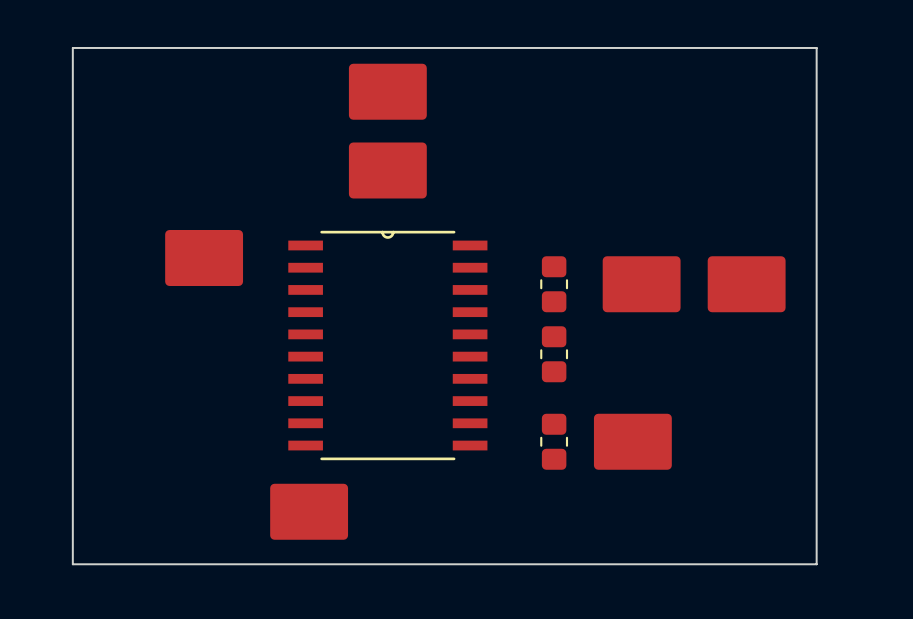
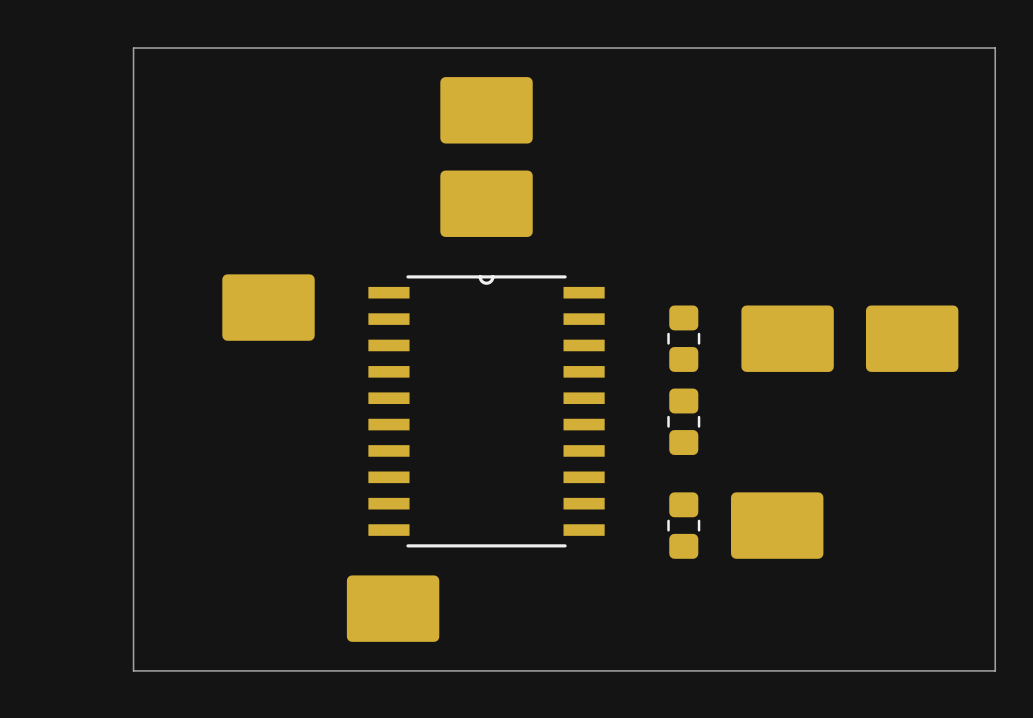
board edge: (816, 47) (72, 47) (72, 564) (90, 564) -> (995, 58) (995, 48) (133, 48) (133, 670)

